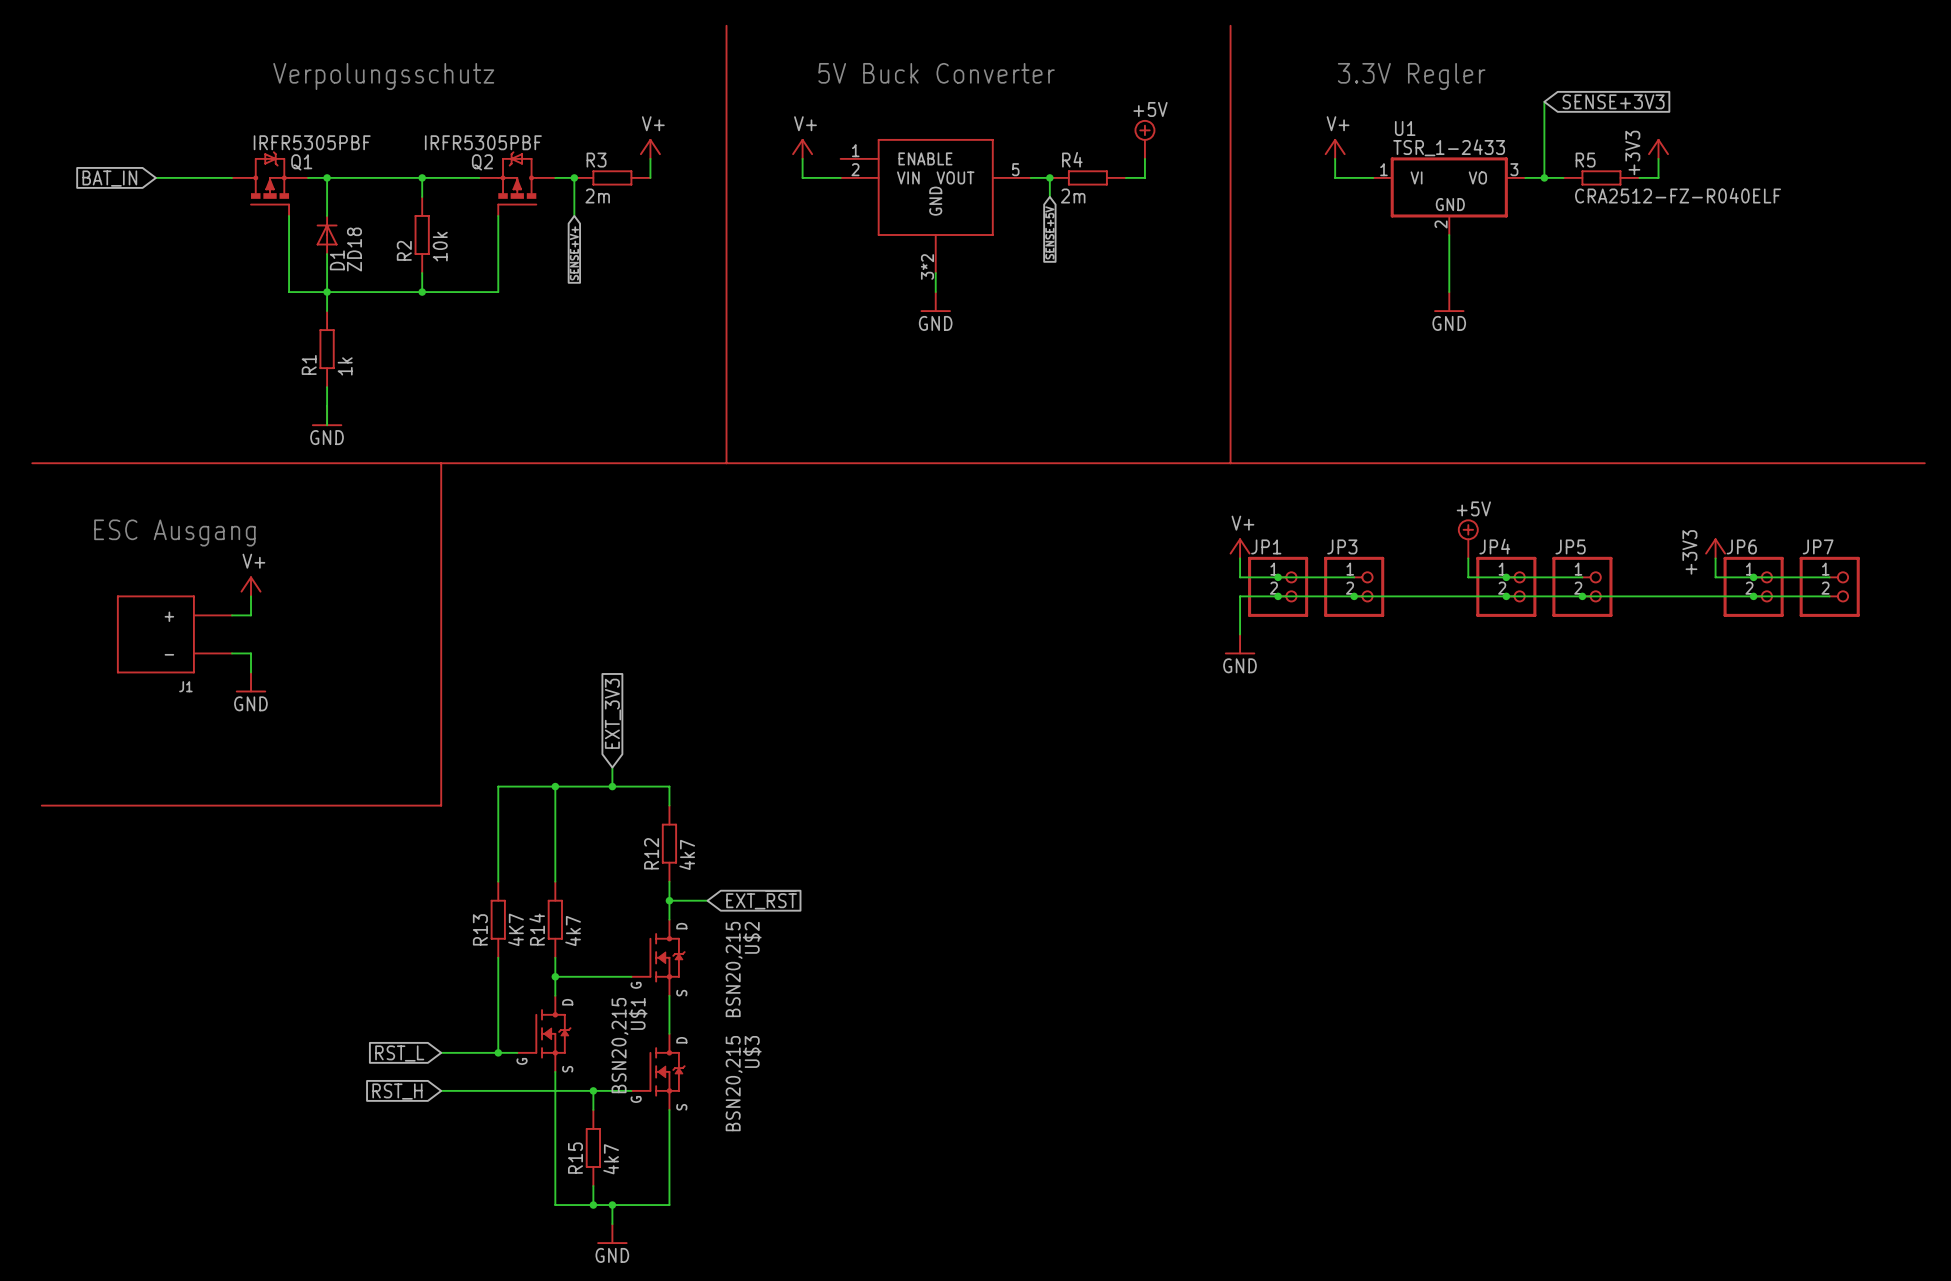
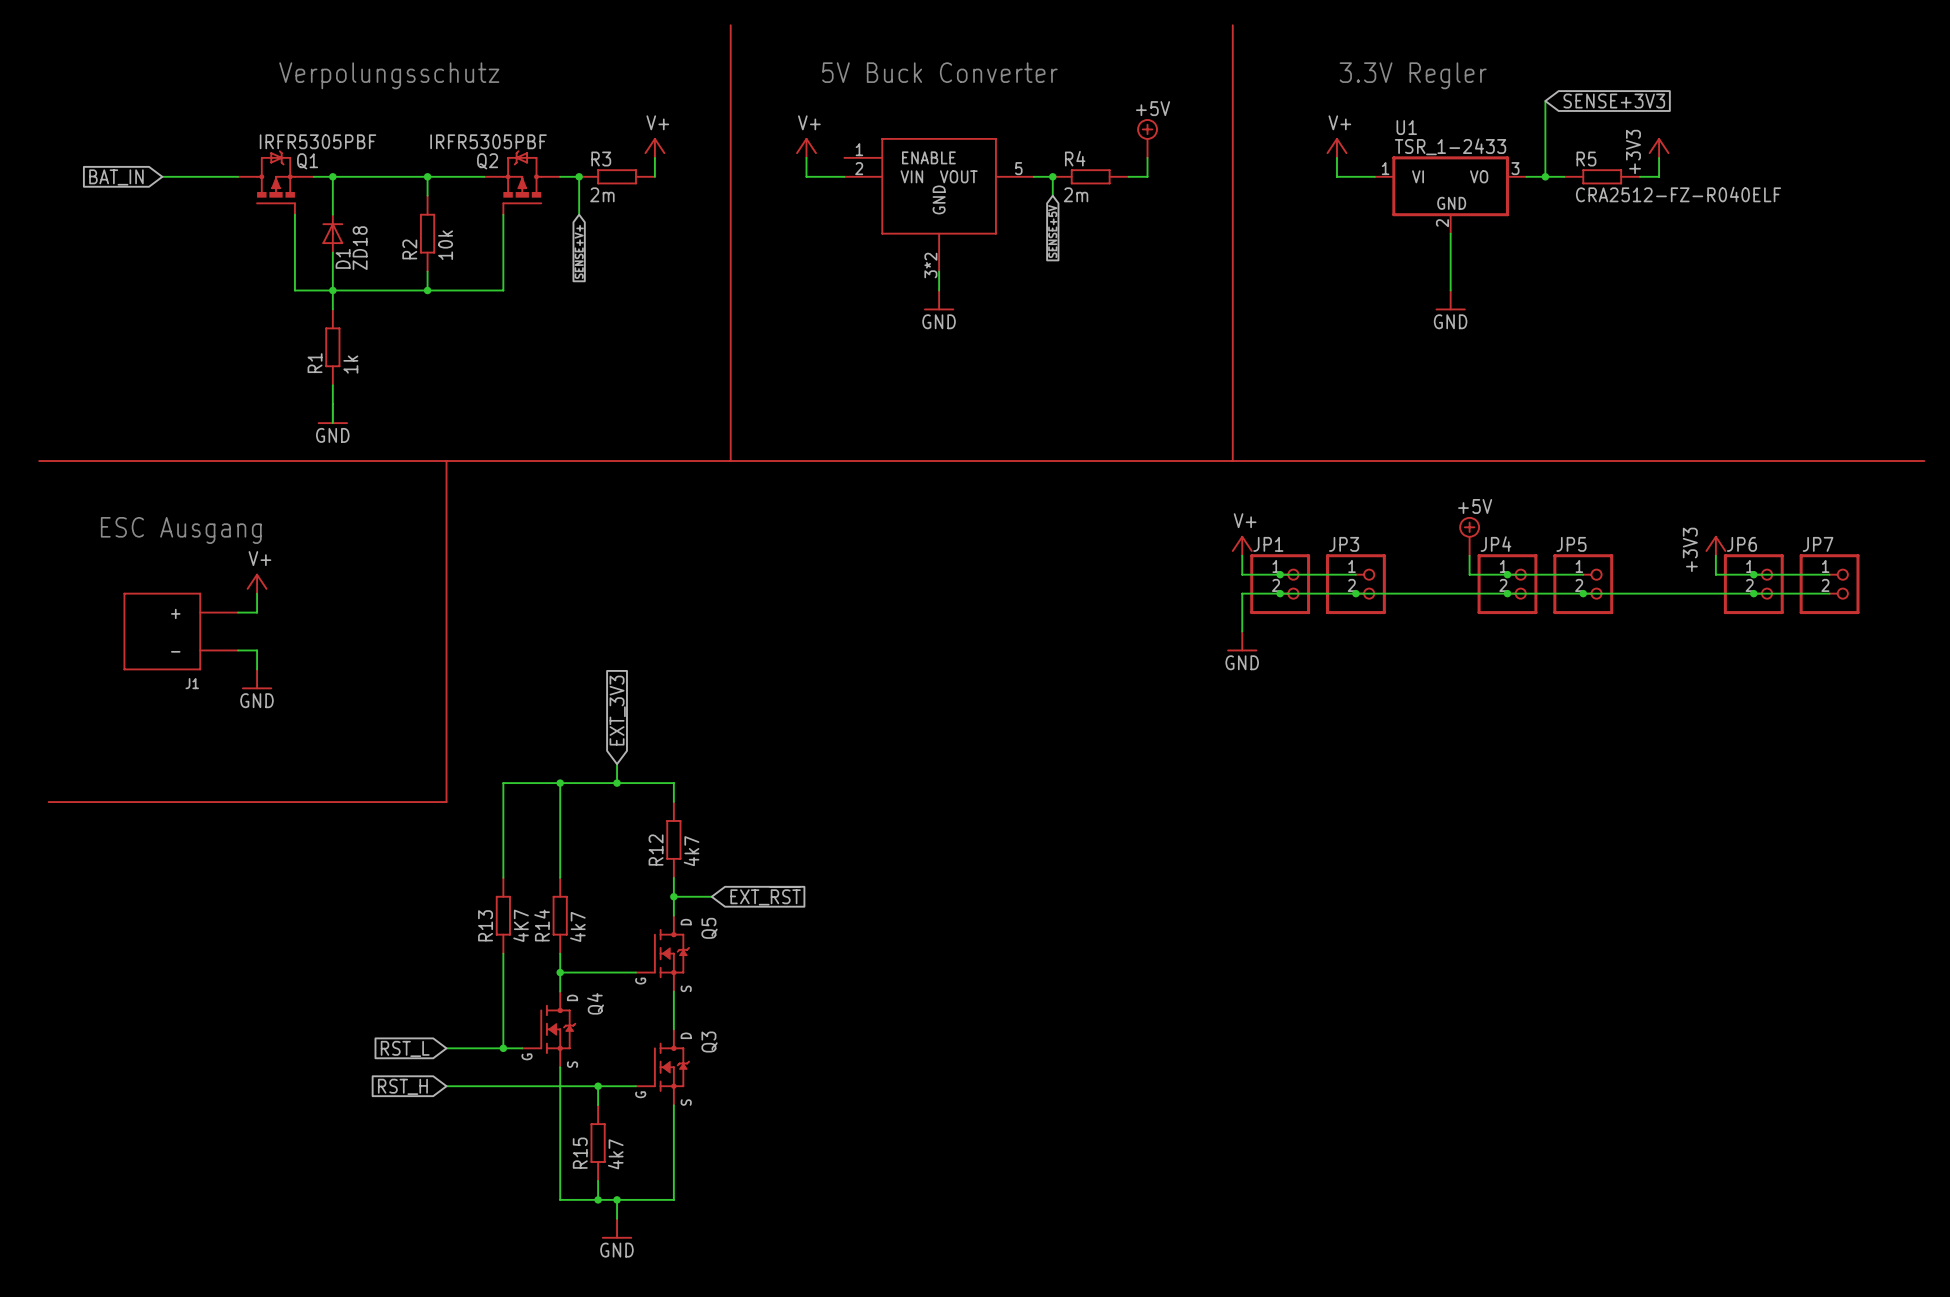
U$2 name: U$2 (752, 937) -> Q5 (709, 928)
U$2 value: BSN20,215 (734, 969) -> none
U$1 name: U$1 (638, 1013) -> Q4 (595, 1003)
U$1 value: BSN20,215 (620, 1045) -> none
U$3 name: U$3 (752, 1051) -> Q3 (709, 1042)
U$3 value: BSN20,215 (734, 1083) -> none

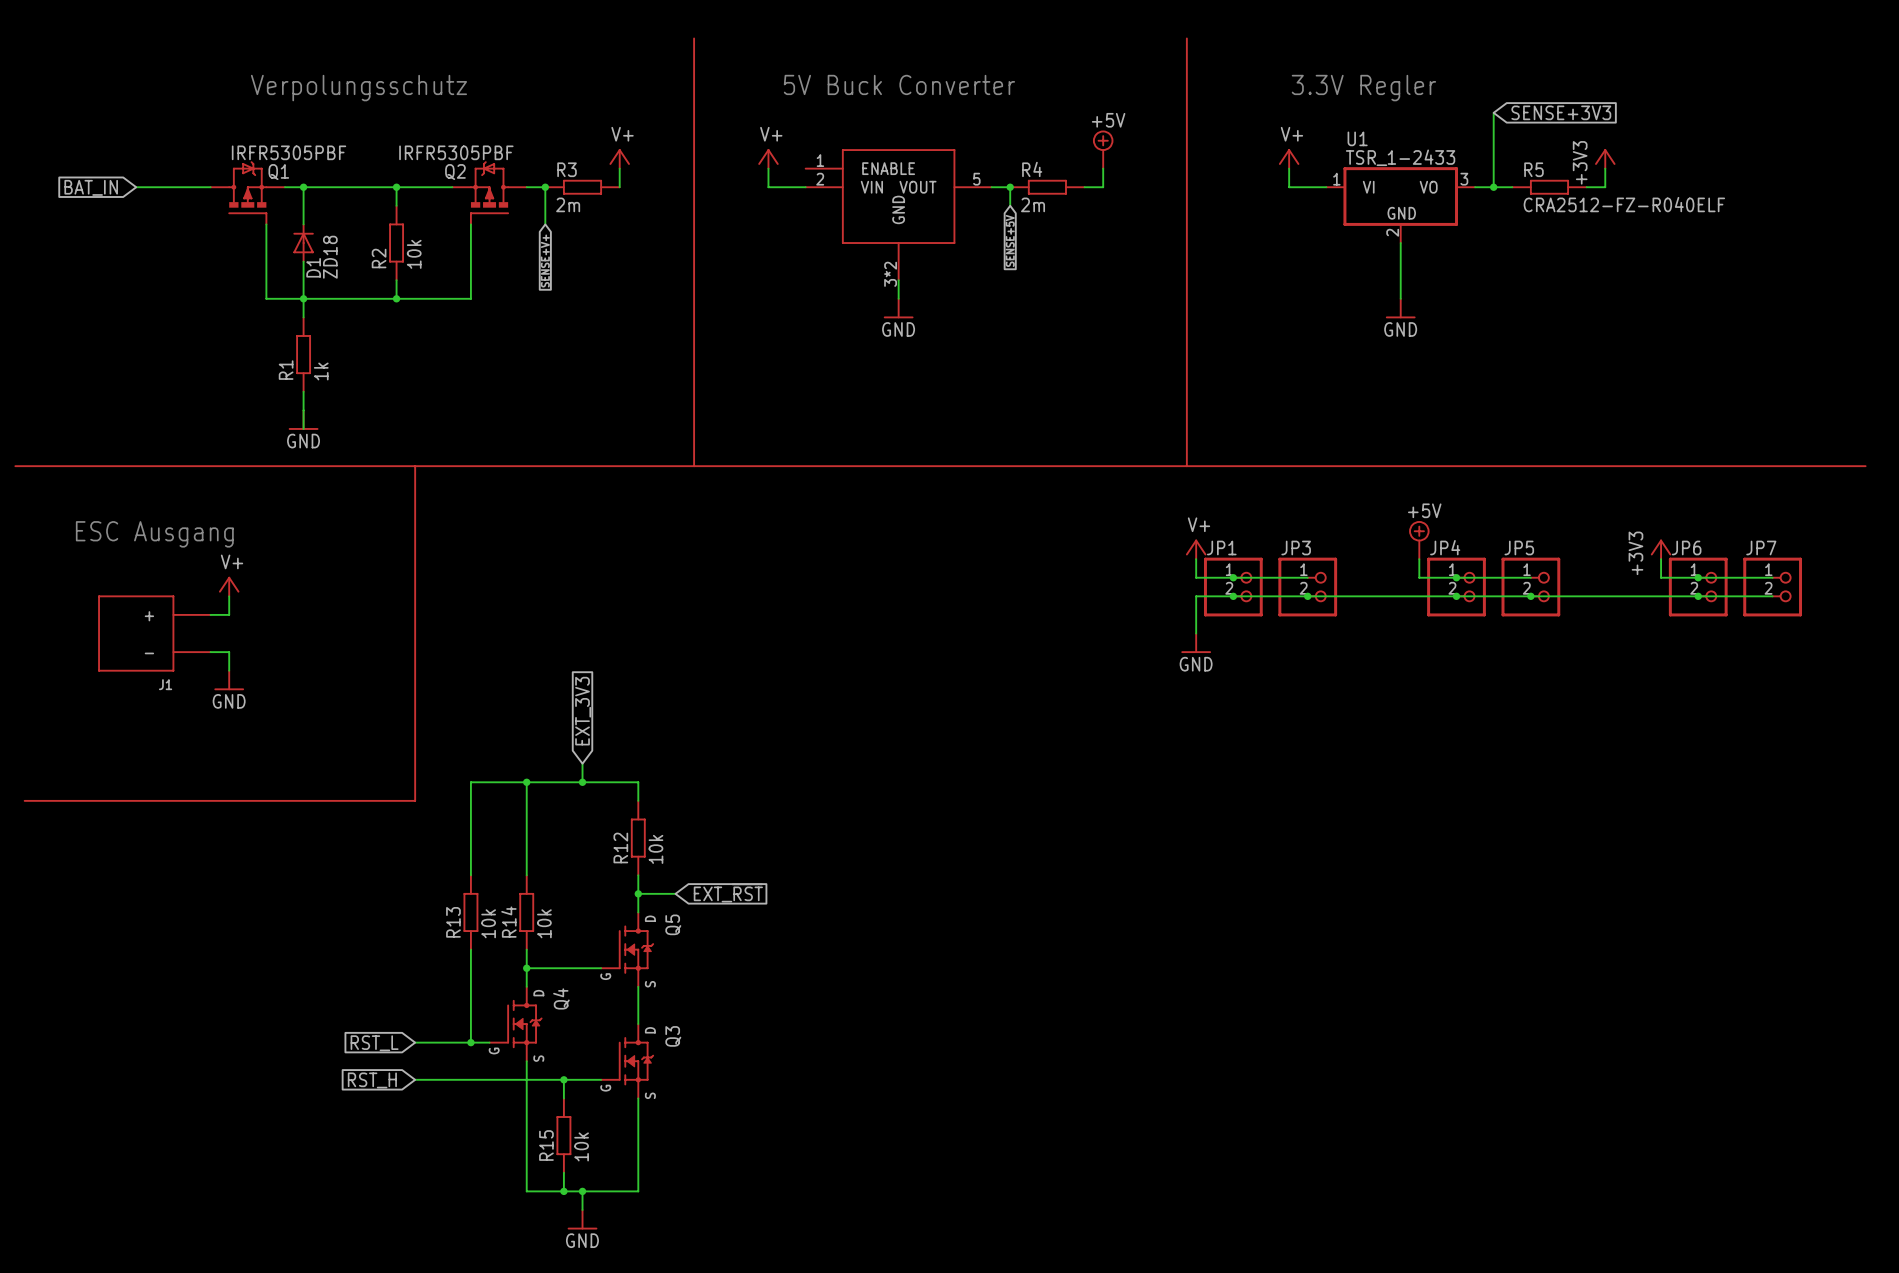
R12 value: 4k7 (691, 851) -> 10k (655, 849)
R13 value: 4K7 (521, 925) -> 10k (488, 923)
R14 value: 4k7 (577, 926) -> 10k (544, 923)
R15 value: 4k7 (615, 1154) -> 10k (581, 1146)

